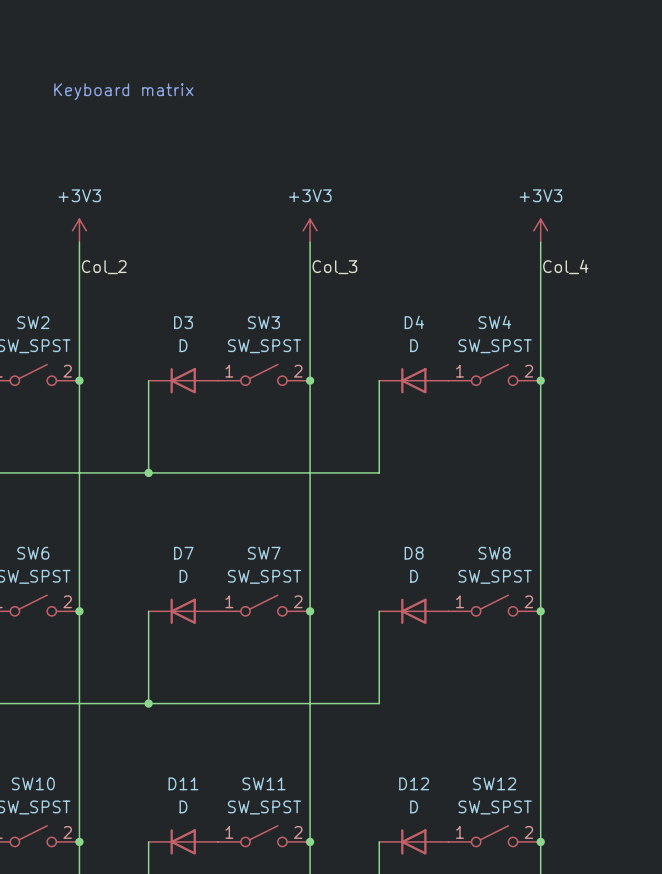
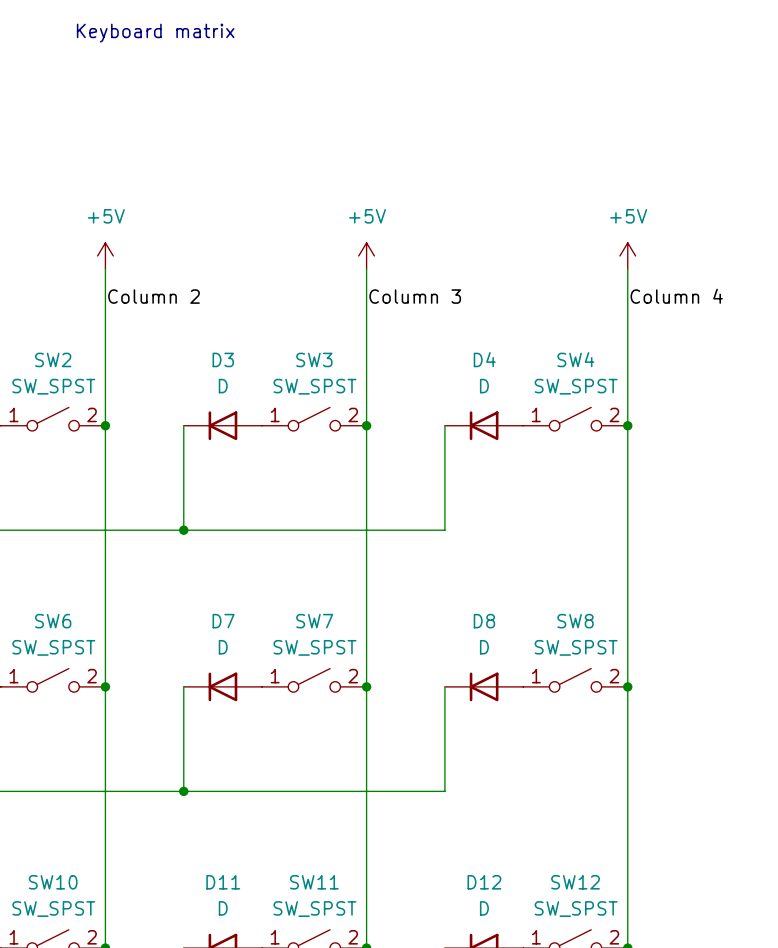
text position: Keyboard matrix (123, 91) -> Keyboard matrix (155, 33)
power symbol: +3V3 (79, 230) -> +5V (105, 255)
power symbol: +3V3 (310, 230) -> +5V (366, 255)
power symbol: +3V3 (540, 230) -> +5V (627, 255)
label: Col_4 (565, 266) -> Column 4 (676, 296)
label: Col_2 (104, 267) -> Column 2 (154, 296)
label: Col_3 (334, 267) -> Column 3 (415, 296)

